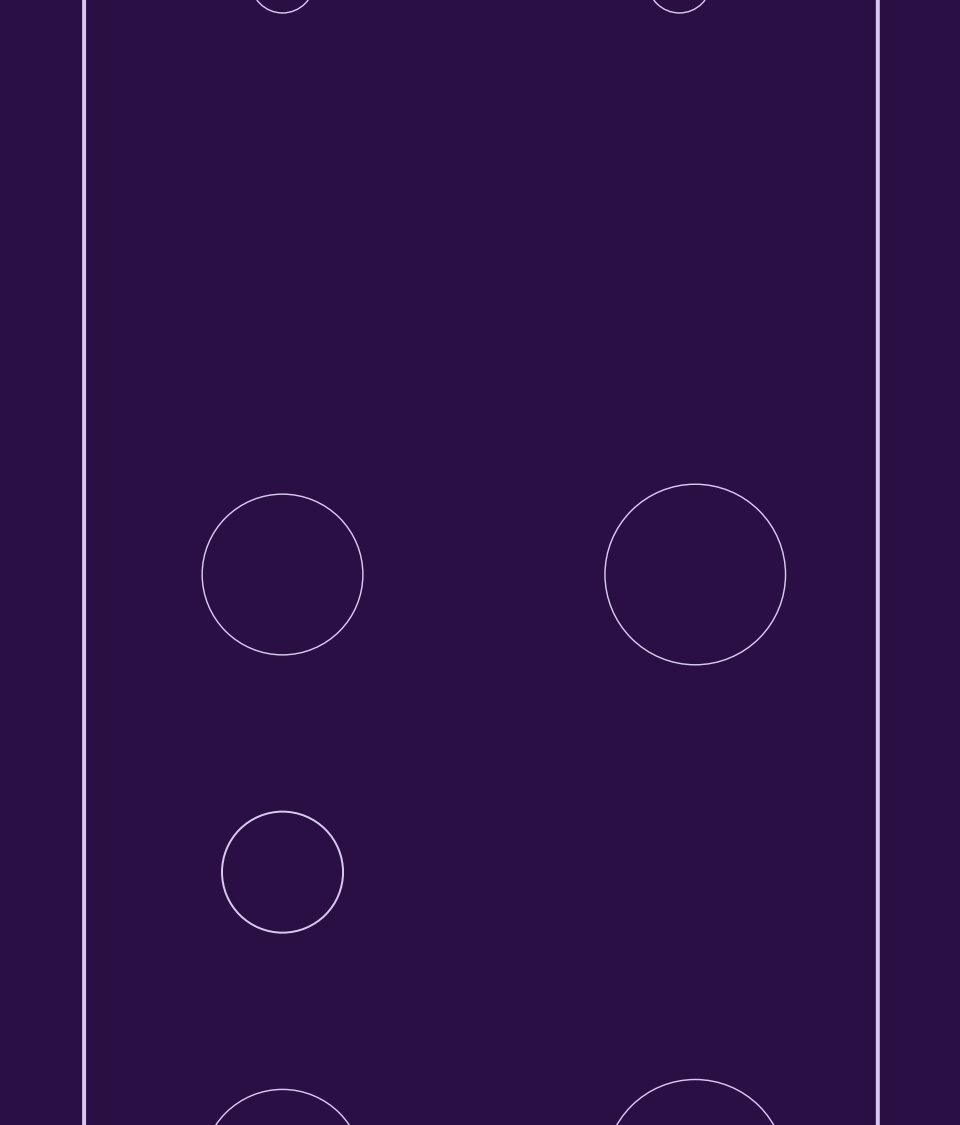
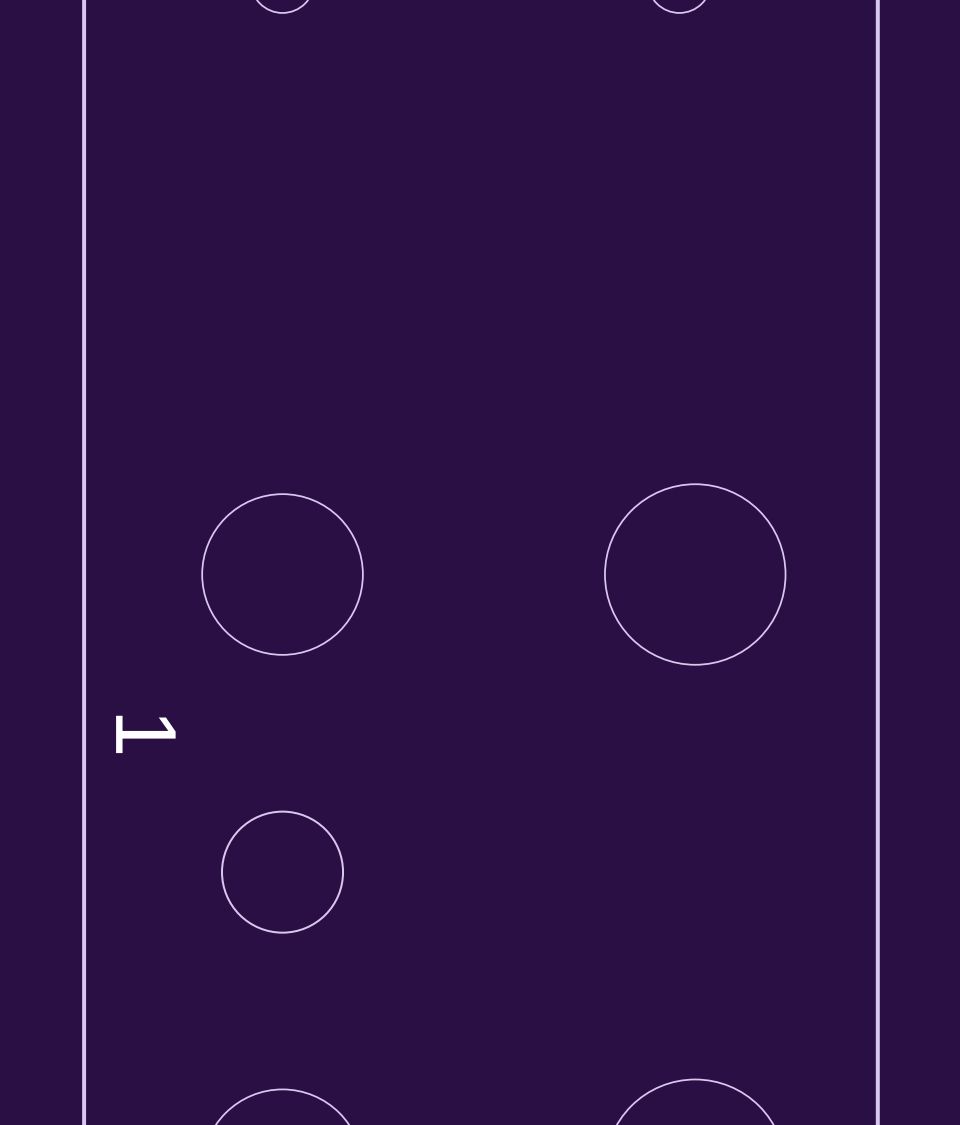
text: none -> 1 (145, 734)

